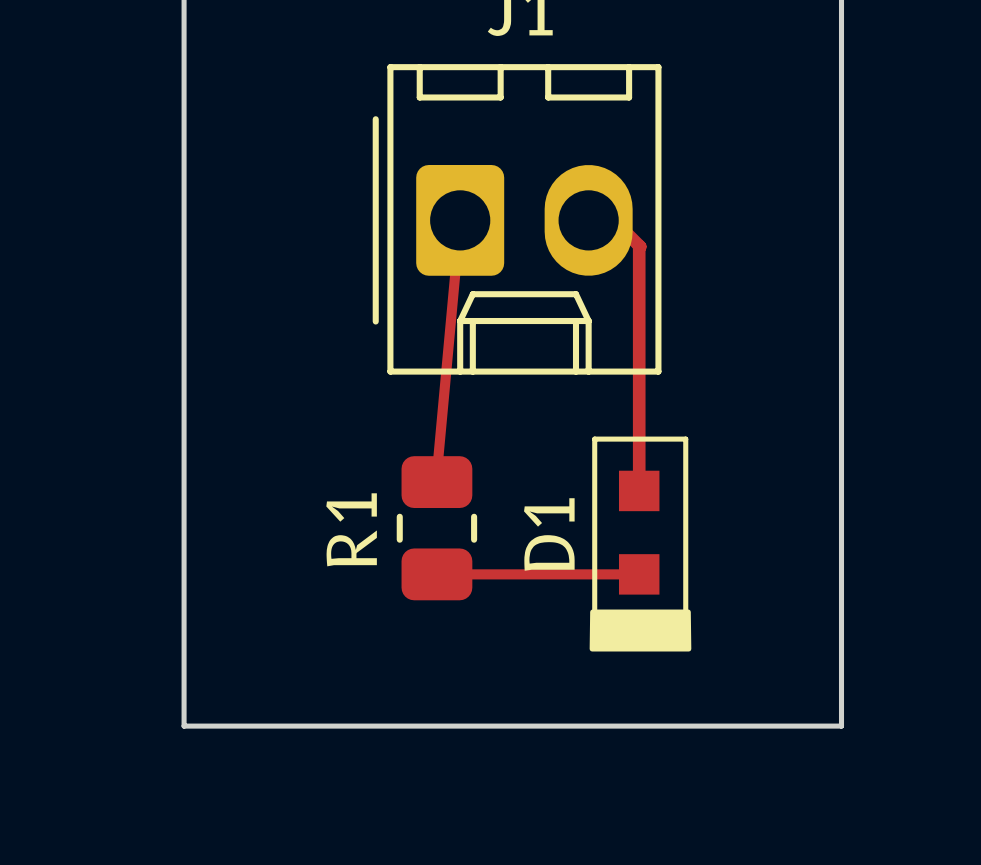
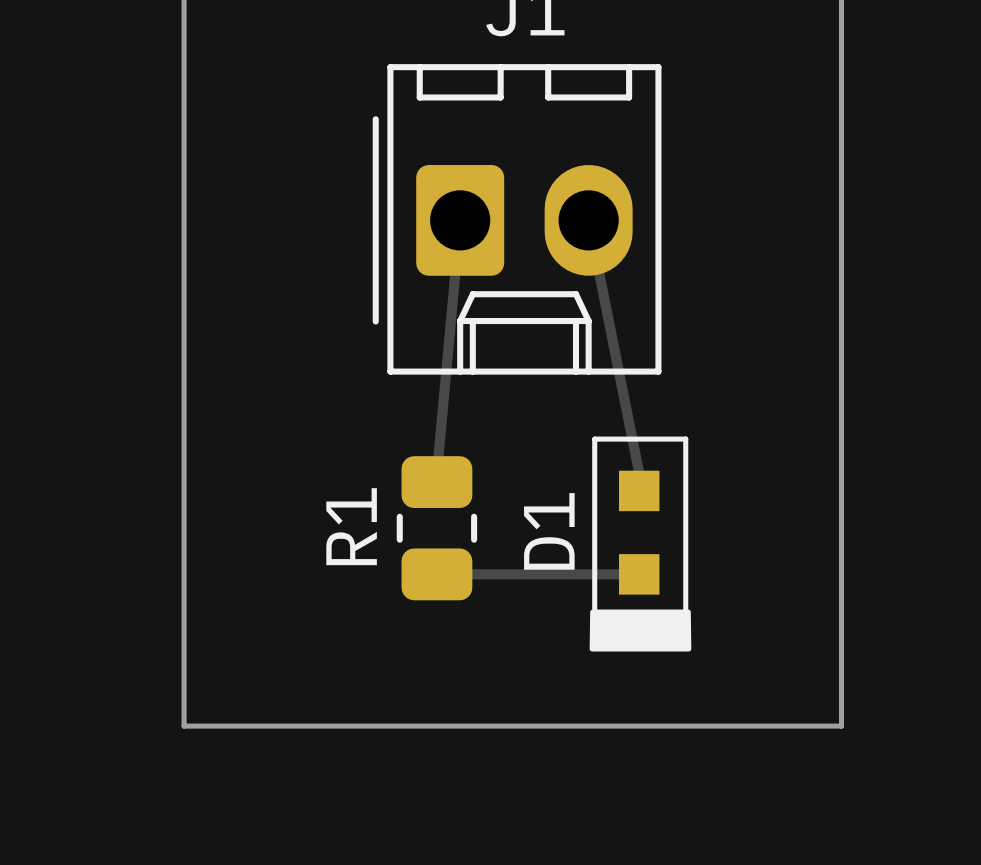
track: (588, 220) (613, 220) (640, 246) (639, 490) -> (588, 220) (639, 473)

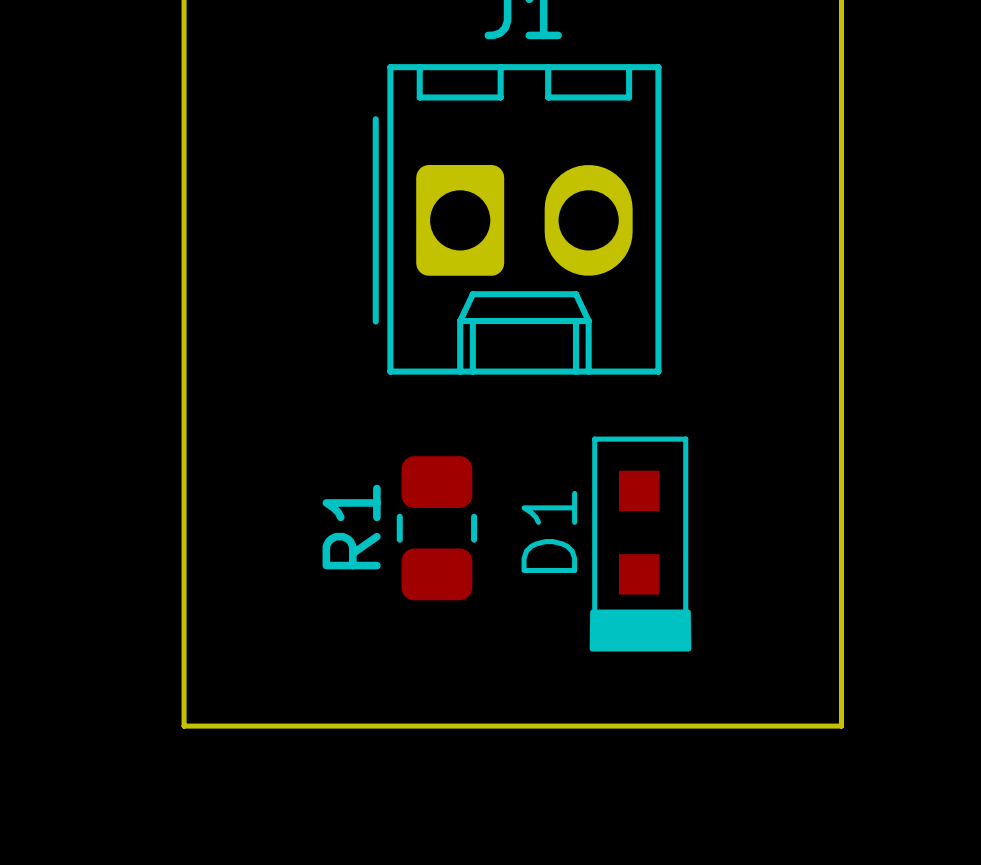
track: (460, 220) (436, 473) -> none
track: (588, 220) (639, 473) -> none
track: (436, 574) (639, 574) -> none

